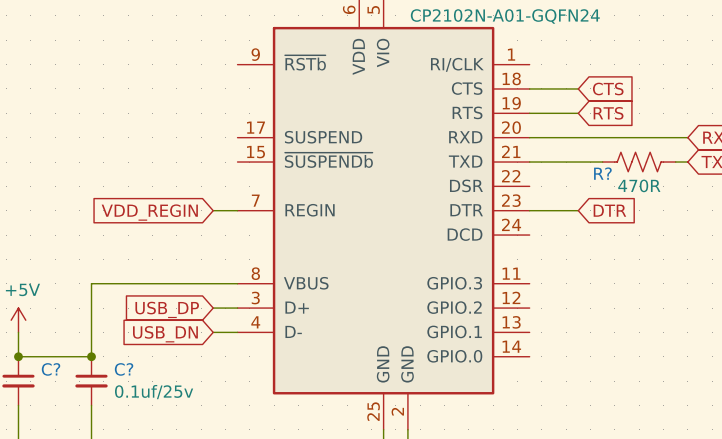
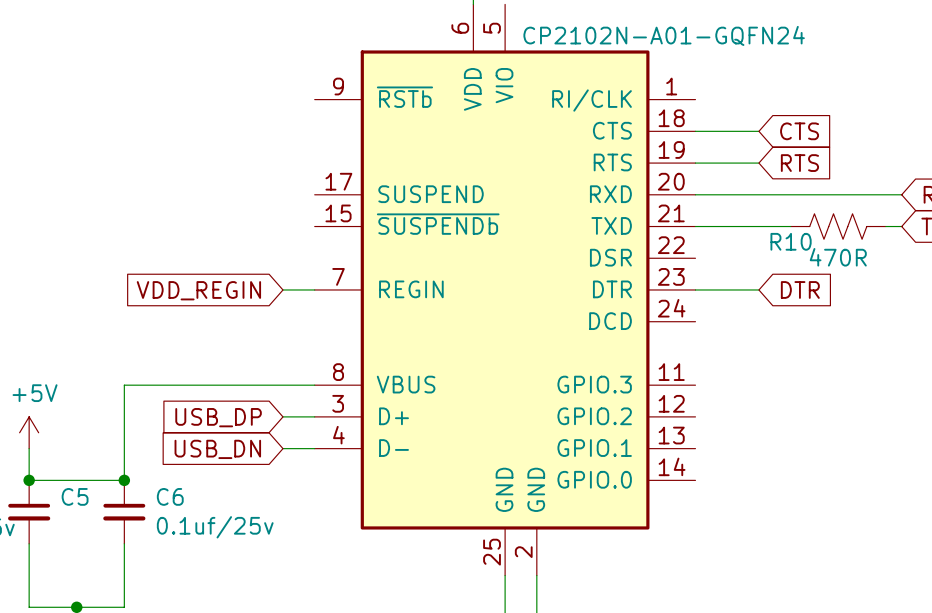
R? name: R? (602, 173) -> R10 (791, 241)
C? name: C? (51, 369) -> C5 (75, 496)
C? name: C? (124, 369) -> C6 (170, 496)

